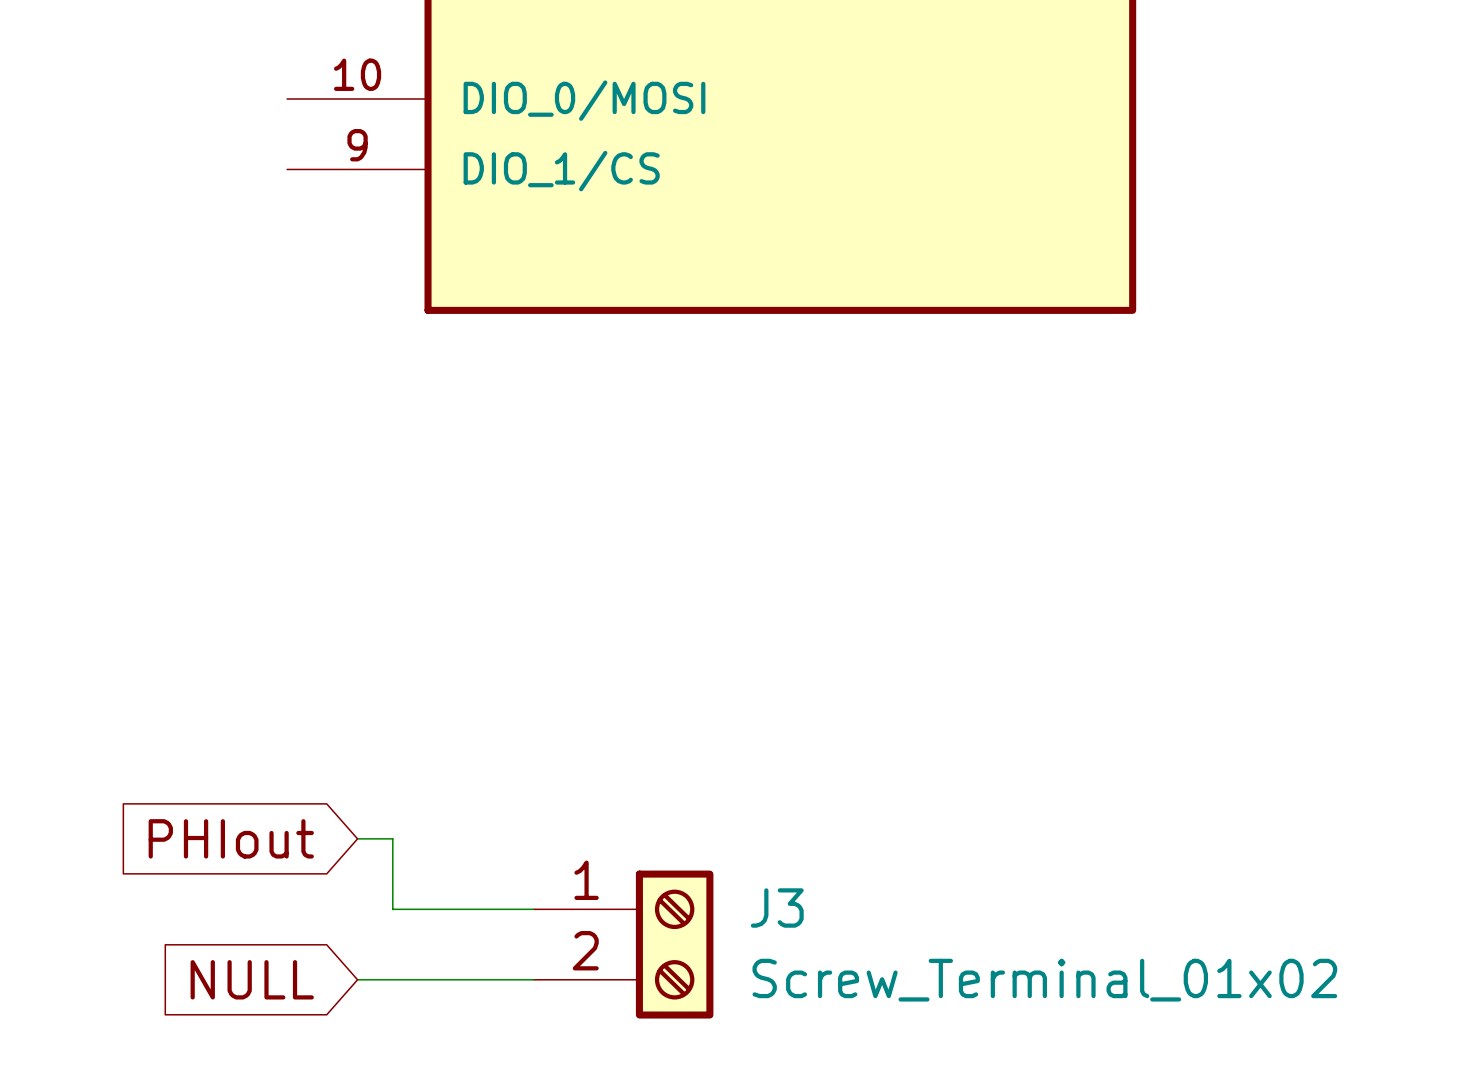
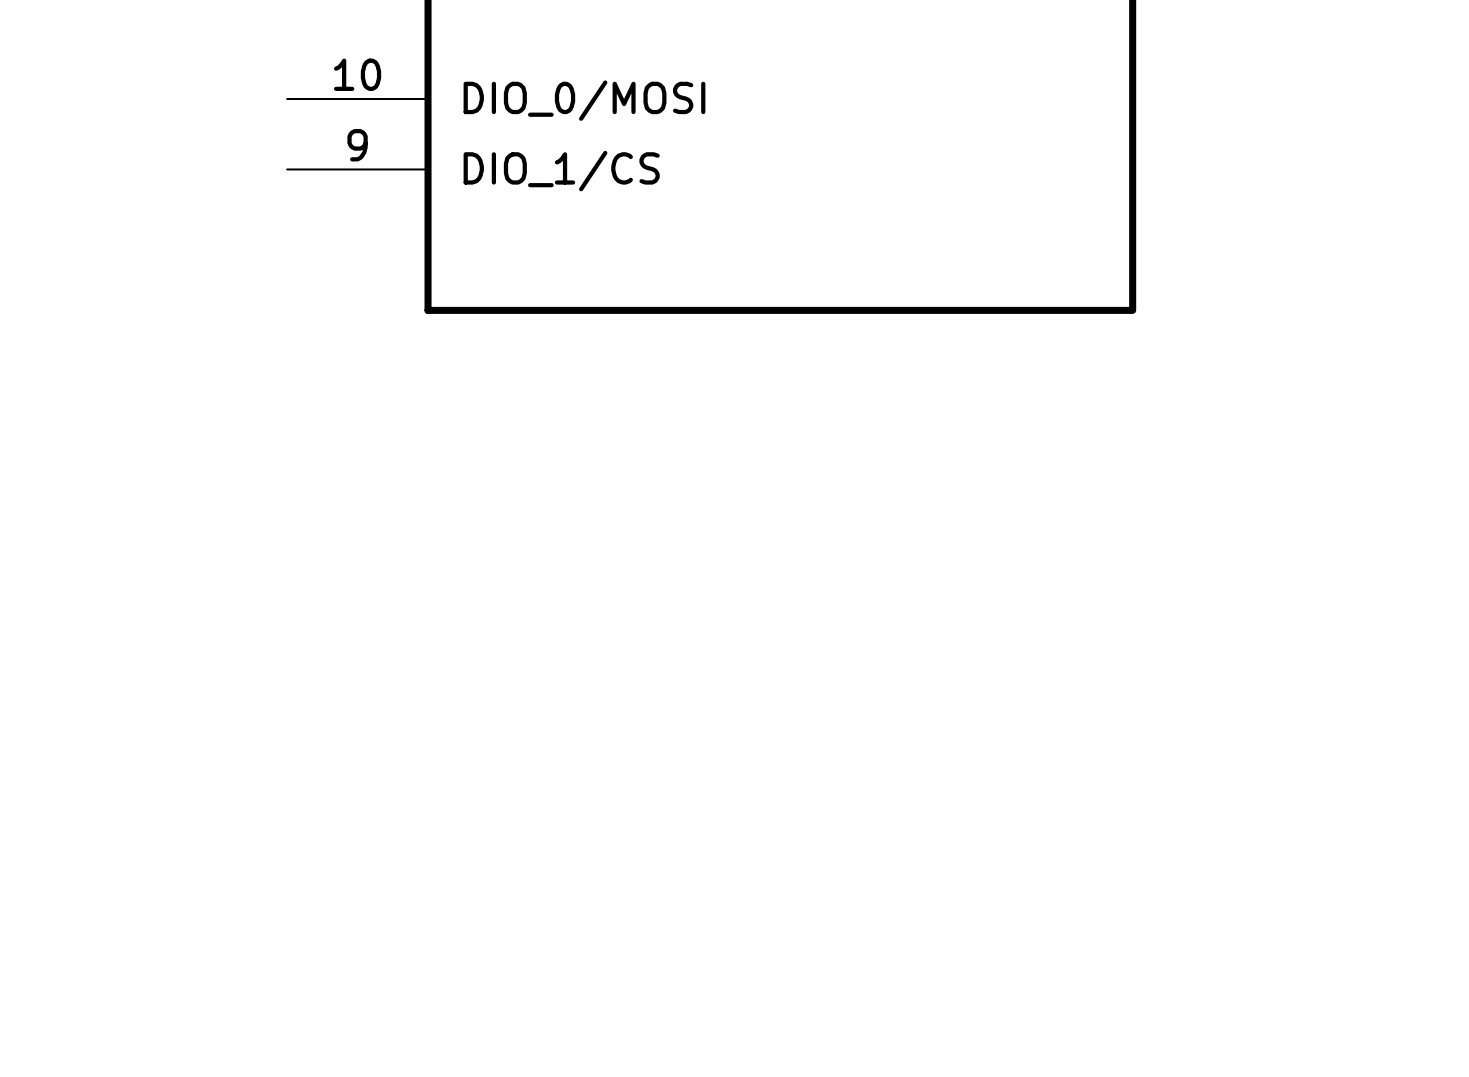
global label: PHIout (231, 838) -> none
wire: (357, 838) (392, 838) (392, 909) (533, 909) -> none
J3: Screw_Terminal_01x02 (623, 944) -> none
global label: NULL (252, 979) -> none
wire: (357, 979) (533, 979) -> none

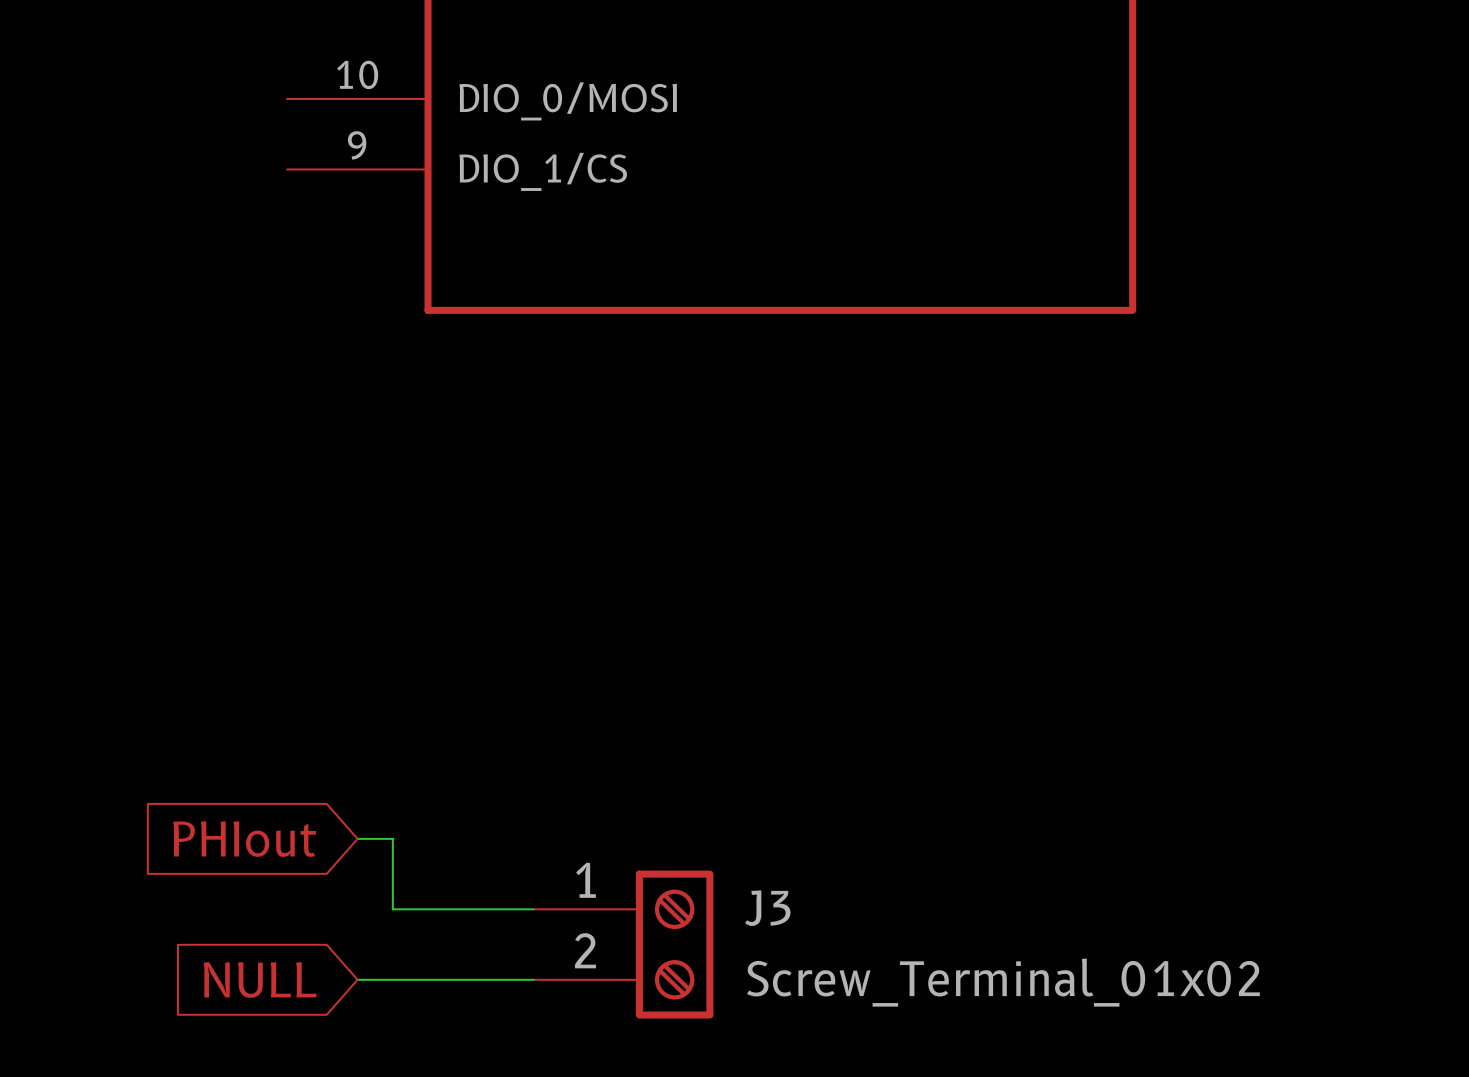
global label: none -> PHIout (244, 839)
wire: none -> (357, 838) (392, 838) (392, 909) (533, 909)
J3: none -> Screw_Terminal_01x02 (623, 944)
global label: none -> NULL (260, 979)
wire: none -> (357, 979) (533, 979)

